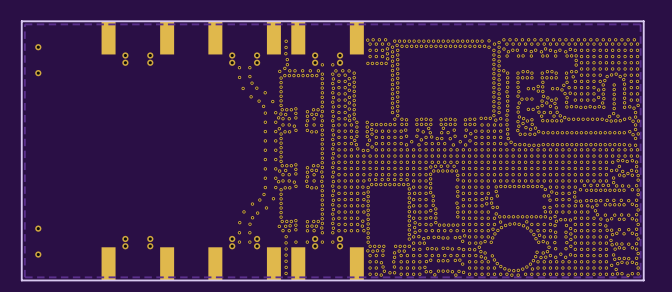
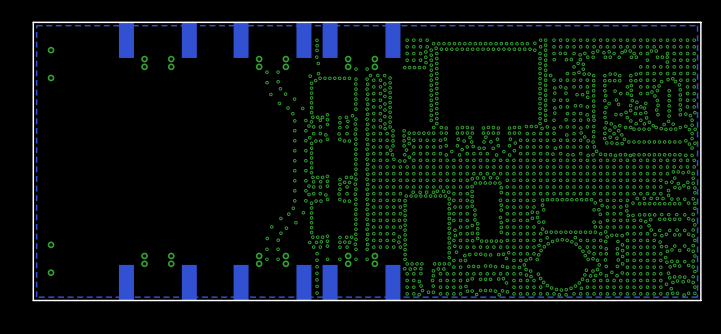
via: none -> (407, 40)
via: none -> (413, 40)
via: none -> (420, 40)
via: none -> (427, 40)
via: none -> (540, 40)
via: none -> (545, 40)
via: none -> (554, 40)
via: none -> (560, 40)
via: none -> (567, 40)
via: none -> (574, 40)
via: none -> (580, 40)
via: none -> (587, 40)
via: none -> (594, 40)
via: none -> (600, 40)
via: none -> (607, 40)
via: none -> (614, 40)
via: none -> (620, 40)
via: none -> (627, 40)
via: none -> (634, 40)
via: none -> (640, 40)
via: none -> (647, 40)
via: none -> (654, 40)
via: none -> (660, 40)
via: none -> (667, 40)
via: none -> (674, 40)
via: none -> (680, 40)
via: none -> (687, 40)
via: none -> (694, 40)
via: none -> (316, 40)
via: (373, 39) -> none
via: (379, 39) -> none
via: (385, 39) -> none
via: (503, 39) -> none
via: (509, 39) -> none
via: (516, 39) -> none
via: (522, 39) -> none
via: (528, 39) -> none
via: (534, 39) -> none
via: (541, 39) -> none
via: (547, 39) -> none
via: (553, 39) -> none
via: (559, 39) -> none
via: (565, 39) -> none
via: (572, 39) -> none
via: (578, 39) -> none
via: (584, 39) -> none
via: (590, 39) -> none
via: (597, 39) -> none
via: (603, 39) -> none
via: (609, 39) -> none
via: (615, 39) -> none
via: (621, 39) -> none
via: (628, 39) -> none
via: (634, 39) -> none
via: (367, 40) -> none
via: (286, 41) -> none
via: none -> (317, 45)
via: (545, 48) -> none
via: none -> (597, 51)
via: none -> (609, 51)
via: none -> (625, 51)
via: none -> (630, 51)
via: none -> (651, 51)
via: none -> (656, 51)
via: (503, 49) -> none
via: none -> (593, 52)
via: none -> (603, 52)
via: none -> (554, 53)
via: (550, 50) -> none
via: (559, 50) -> none
via: none -> (614, 53)
via: (575, 50) -> none
via: (600, 50) -> none
via: (606, 50) -> none
via: (508, 51) -> none
via: (541, 51) -> none
via: (555, 51) -> none
via: (565, 51) -> none
via: none -> (587, 57)
via: none -> (593, 57)
via: none -> (605, 57)
via: none -> (610, 57)
via: none -> (619, 57)
via: none -> (631, 57)
via: none -> (636, 57)
via: none -> (657, 57)
via: none -> (662, 57)
via: none -> (667, 57)
via: (547, 55) -> none
via: (571, 55) -> none
via: (576, 55) -> none
via: (542, 56) -> none
via: (555, 56) -> none
via: (567, 56) -> none
via: (581, 56) -> none
via: (587, 56) -> none
via: (600, 56) -> none
via: (606, 56) -> none
via: (612, 56) -> none
via: none -> (667, 62)
via: none -> (578, 63)
via: none -> (583, 64)
via: (576, 60) -> none
via: none -> (574, 66)
via: (581, 62) -> none
via: (287, 64) -> none
via: none -> (583, 69)
via: (576, 65) -> none
via: none -> (578, 72)
via: (284, 68) -> none
via: none -> (567, 73)
via: none -> (574, 73)
via: (581, 68) -> none
via: none -> (318, 73)
via: none -> (584, 74)
via: none -> (589, 74)
via: none -> (610, 74)
via: none -> (615, 74)
via: none -> (636, 74)
via: (289, 70) -> none
via: (294, 70) -> none
via: (302, 70) -> none
via: (310, 70) -> none
via: (318, 70) -> none
via: none -> (593, 75)
via: none -> (604, 75)
via: none -> (619, 75)
via: none -> (630, 75)
via: (523, 71) -> none
via: (527, 71) -> none
via: (547, 71) -> none
via: (551, 71) -> none
via: (571, 71) -> none
via: (576, 71) -> none
via: none -> (320, 78)
via: none -> (324, 78)
via: none -> (329, 78)
via: none -> (334, 78)
via: none -> (339, 78)
via: none -> (344, 78)
via: none -> (349, 78)
via: (507, 73) -> none
via: (517, 73) -> none
via: (531, 73) -> none
via: (542, 73) -> none
via: (556, 73) -> none
via: (566, 73) -> none
via: none -> (672, 78)
via: (611, 74) -> none
via: none -> (668, 79)
via: (616, 74) -> none
via: (289, 75) -> none
via: (293, 75) -> none
via: (298, 75) -> none
via: (303, 75) -> none
via: (307, 75) -> none
via: (312, 75) -> none
via: (316, 75) -> none
via: none -> (554, 80)
via: none -> (560, 80)
via: none -> (567, 80)
via: none -> (574, 80)
via: none -> (580, 80)
via: none -> (587, 80)
via: none -> (593, 80)
via: none -> (604, 80)
via: none -> (609, 80)
via: none -> (614, 80)
via: none -> (619, 80)
via: none -> (630, 80)
via: (581, 75) -> none
via: none -> (635, 80)
via: (573, 76) -> none
via: (507, 77) -> none
via: (517, 77) -> none
via: (522, 77) -> none
via: (527, 77) -> none
via: (531, 77) -> none
via: (542, 77) -> none
via: (546, 77) -> none
via: (551, 77) -> none
via: (556, 77) -> none
via: (566, 77) -> none
via: none -> (593, 85)
via: none -> (604, 85)
via: none -> (631, 85)
via: none -> (560, 86)
via: none -> (574, 86)
via: none -> (580, 86)
via: none -> (587, 86)
via: (581, 81) -> none
via: (542, 82) -> none
via: (567, 82) -> none
via: none -> (631, 90)
via: none -> (593, 90)
via: none -> (604, 90)
via: (542, 86) -> none
via: none -> (651, 91)
via: (581, 87) -> none
via: (552, 88) -> none
via: (557, 88) -> none
via: none -> (593, 95)
via: none -> (605, 95)
via: (561, 89) -> none
via: none -> (631, 95)
via: (598, 89) -> none
via: none -> (654, 96)
via: (603, 89) -> none
via: (507, 91) -> none
via: (518, 91) -> none
via: (542, 91) -> none
via: none -> (554, 100)
via: none -> (560, 100)
via: none -> (567, 100)
via: (570, 93) -> none
via: (575, 93) -> none
via: (581, 93) -> none
via: (587, 93) -> none
via: (593, 93) -> none
via: none -> (593, 100)
via: none -> (604, 100)
via: none -> (632, 100)
via: none -> (636, 102)
via: (507, 96) -> none
via: (518, 96) -> none
via: (543, 96) -> none
via: none -> (645, 103)
via: (547, 97) -> none
via: none -> (609, 103)
via: (598, 97) -> none
via: none -> (630, 105)
via: (521, 99) -> none
via: none -> (593, 106)
via: (556, 99) -> none
via: none -> (560, 106)
via: none -> (567, 106)
via: none -> (587, 106)
via: (551, 100) -> none
via: none -> (605, 107)
via: (575, 100) -> none
via: (581, 100) -> none
via: (593, 100) -> none
via: (542, 101) -> none
via: none -> (636, 108)
via: none -> (644, 108)
via: (546, 102) -> none
via: (566, 102) -> none
via: (519, 103) -> none
via: (554, 103) -> none
via: none -> (630, 110)
via: none -> (593, 111)
via: (542, 105) -> none
via: none -> (604, 112)
via: none -> (626, 112)
via: none -> (645, 112)
via: (322, 106) -> none
via: none -> (567, 113)
via: none -> (574, 113)
via: none -> (580, 113)
via: (550, 106) -> none
via: (571, 106) -> none
via: (576, 106) -> none
via: none -> (635, 113)
via: none -> (640, 113)
via: (590, 106) -> none
via: (599, 106) -> none
via: none -> (327, 114)
via: (518, 107) -> none
via: (556, 107) -> none
via: none -> (615, 114)
via: (566, 107) -> none
via: none -> (621, 114)
via: (580, 107) -> none
via: (585, 107) -> none
via: (594, 107) -> none
via: (295, 108) -> none
via: none -> (352, 115)
via: none -> (593, 116)
via: (318, 109) -> none
via: (528, 109) -> none
via: (533, 109) -> none
via: none -> (605, 117)
via: none -> (627, 117)
via: none -> (339, 117)
via: (507, 110) -> none
via: none -> (646, 117)
via: none -> (327, 119)
via: (307, 111) -> none
via: none -> (320, 120)
via: none -> (554, 120)
via: none -> (574, 120)
via: none -> (580, 120)
via: (550, 112) -> none
via: (557, 112) -> none
via: none -> (640, 120)
via: (295, 113) -> none
via: none -> (347, 121)
via: none -> (630, 120)
via: (285, 114) -> none
via: none -> (339, 122)
via: (311, 114) -> none
via: (316, 114) -> none
via: none -> (606, 122)
via: none -> (649, 122)
via: (507, 115) -> none
via: none -> (636, 123)
via: none -> (644, 123)
via: none -> (327, 124)
via: (307, 116) -> none
via: (519, 116) -> none
via: (541, 116) -> none
via: (554, 116) -> none
via: (295, 117) -> none
via: (564, 117) -> none
via: none -> (619, 125)
via: none -> (653, 125)
via: none -> (560, 126)
via: none -> (567, 126)
via: (523, 118) -> none
via: none -> (574, 126)
via: none -> (587, 126)
via: none -> (593, 126)
via: none -> (614, 127)
via: none -> (339, 127)
via: none -> (605, 128)
via: (568, 119) -> none
via: (583, 119) -> none
via: (587, 119) -> none
via: (592, 119) -> none
via: (597, 119) -> none
via: (307, 120) -> none
via: (527, 120) -> none
via: (542, 120) -> none
via: (547, 120) -> none
via: (552, 120) -> none
via: (556, 120) -> none
via: (561, 120) -> none
via: none -> (633, 129)
via: none -> (639, 129)
via: none -> (643, 129)
via: none -> (649, 129)
via: (517, 121) -> none
via: none -> (609, 130)
via: none -> (618, 130)
via: (523, 123) -> none
via: none -> (593, 131)
via: none -> (574, 133)
via: none -> (604, 133)
via: none -> (614, 133)
via: none -> (621, 134)
via: (525, 127) -> none
via: none -> (593, 136)
via: none -> (610, 137)
via: (507, 129) -> none
via: (530, 129) -> none
via: none -> (604, 138)
via: none -> (616, 138)
via: (517, 130) -> none
via: none -> (624, 139)
via: none -> (554, 140)
via: none -> (560, 140)
via: none -> (567, 140)
via: none -> (574, 140)
via: none -> (580, 140)
via: (548, 132) -> none
via: (552, 132) -> none
via: (557, 132) -> none
via: (562, 132) -> none
via: (567, 132) -> none
via: (571, 132) -> none
via: (507, 133) -> none
via: none -> (606, 142)
via: none -> (611, 142)
via: (520, 134) -> none
via: (525, 134) -> none
via: (530, 134) -> none
via: (534, 134) -> none
via: none -> (617, 143)
via: none -> (622, 143)
via: none -> (560, 146)
via: none -> (567, 146)
via: none -> (574, 146)
via: none -> (580, 146)
via: none -> (587, 146)
via: none -> (594, 146)
via: none -> (596, 151)
via: (511, 142) -> none
via: none -> (560, 153)
via: none -> (580, 153)
via: (515, 144) -> none
via: (548, 144) -> none
via: none -> (600, 154)
via: (552, 144) -> none
via: none -> (605, 154)
via: (557, 144) -> none
via: none -> (610, 154)
via: (562, 144) -> none
via: (567, 144) -> none
via: none -> (620, 154)
via: (571, 144) -> none
via: none -> (625, 154)
via: (576, 144) -> none
via: (529, 145) -> none
via: (533, 145) -> none
via: none -> (615, 155)
via: none -> (630, 155)
via: none -> (313, 181)
via: none -> (320, 181)
via: (285, 170) -> none
via: (279, 171) -> none
via: none -> (308, 186)
via: none -> (437, 191)
via: none -> (443, 191)
via: (369, 179) -> none
via: (401, 179) -> none
via: (407, 179) -> none
via: none -> (448, 192)
via: none -> (406, 196)
via: none -> (411, 196)
via: none -> (415, 196)
via: none -> (420, 196)
via: none -> (425, 196)
via: none -> (430, 196)
via: none -> (435, 196)
via: none -> (440, 196)
via: none -> (445, 196)
via: (371, 184) -> none
via: (376, 184) -> none
via: (380, 184) -> none
via: (385, 184) -> none
via: (389, 184) -> none
via: (394, 184) -> none
via: (399, 184) -> none
via: (403, 184) -> none
via: (408, 184) -> none
via: none -> (449, 198)
via: (409, 188) -> none
via: none -> (449, 203)
via: (409, 193) -> none
via: none -> (449, 208)
via: (409, 198) -> none
via: none -> (449, 213)
via: (409, 202) -> none
via: none -> (449, 218)
via: (409, 207) -> none
via: none -> (449, 223)
via: (409, 211) -> none
via: (414, 211) -> none
via: none -> (449, 228)
via: none -> (454, 230)
via: (409, 216) -> none
via: none -> (449, 233)
via: (413, 218) -> none
via: none -> (455, 235)
via: (409, 220) -> none
via: none -> (449, 238)
via: (415, 222) -> none
via: none -> (453, 240)
via: (409, 225) -> none
via: none -> (449, 243)
via: (414, 227) -> none
via: (409, 229) -> none
via: none -> (454, 246)
via: none -> (449, 247)
via: (415, 232) -> none
via: (409, 234) -> none
via: none -> (456, 252)
via: none -> (449, 252)
via: (413, 236) -> none
via: (418, 236) -> none
via: (409, 239) -> none
via: none -> (449, 257)

